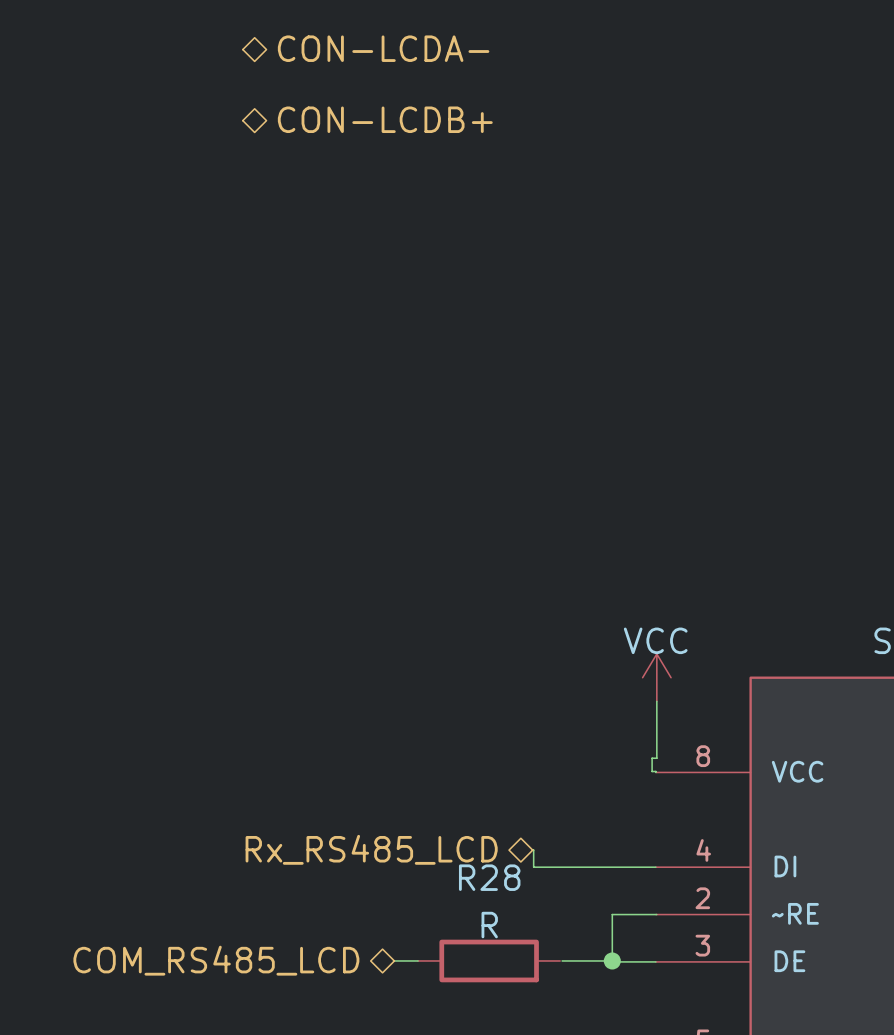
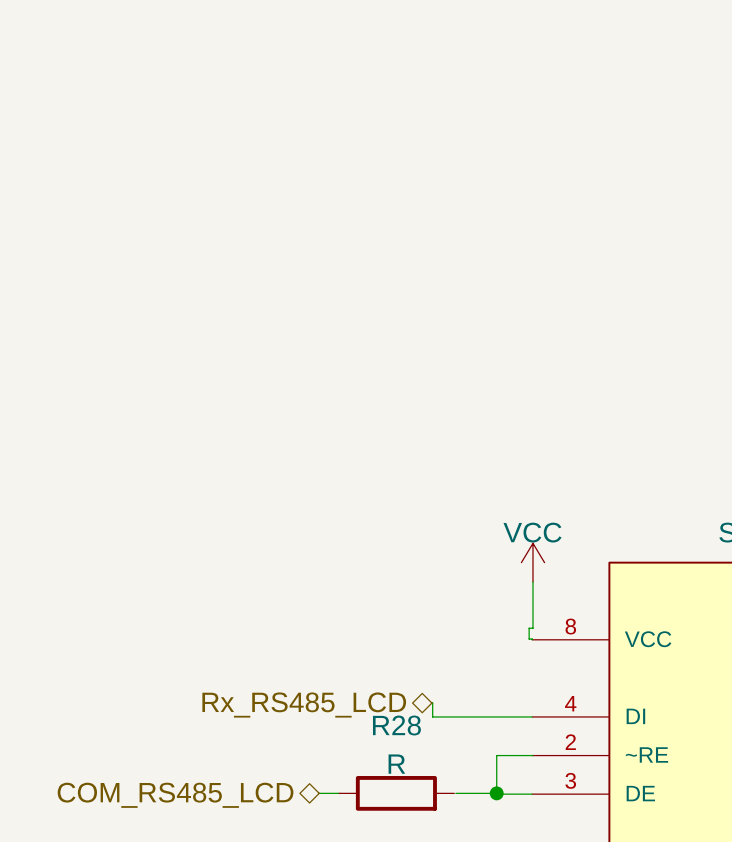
hierarchical label: CON-LCDA- (383, 48) -> none
hierarchical label: CON-LCDB+ (385, 119) -> none

